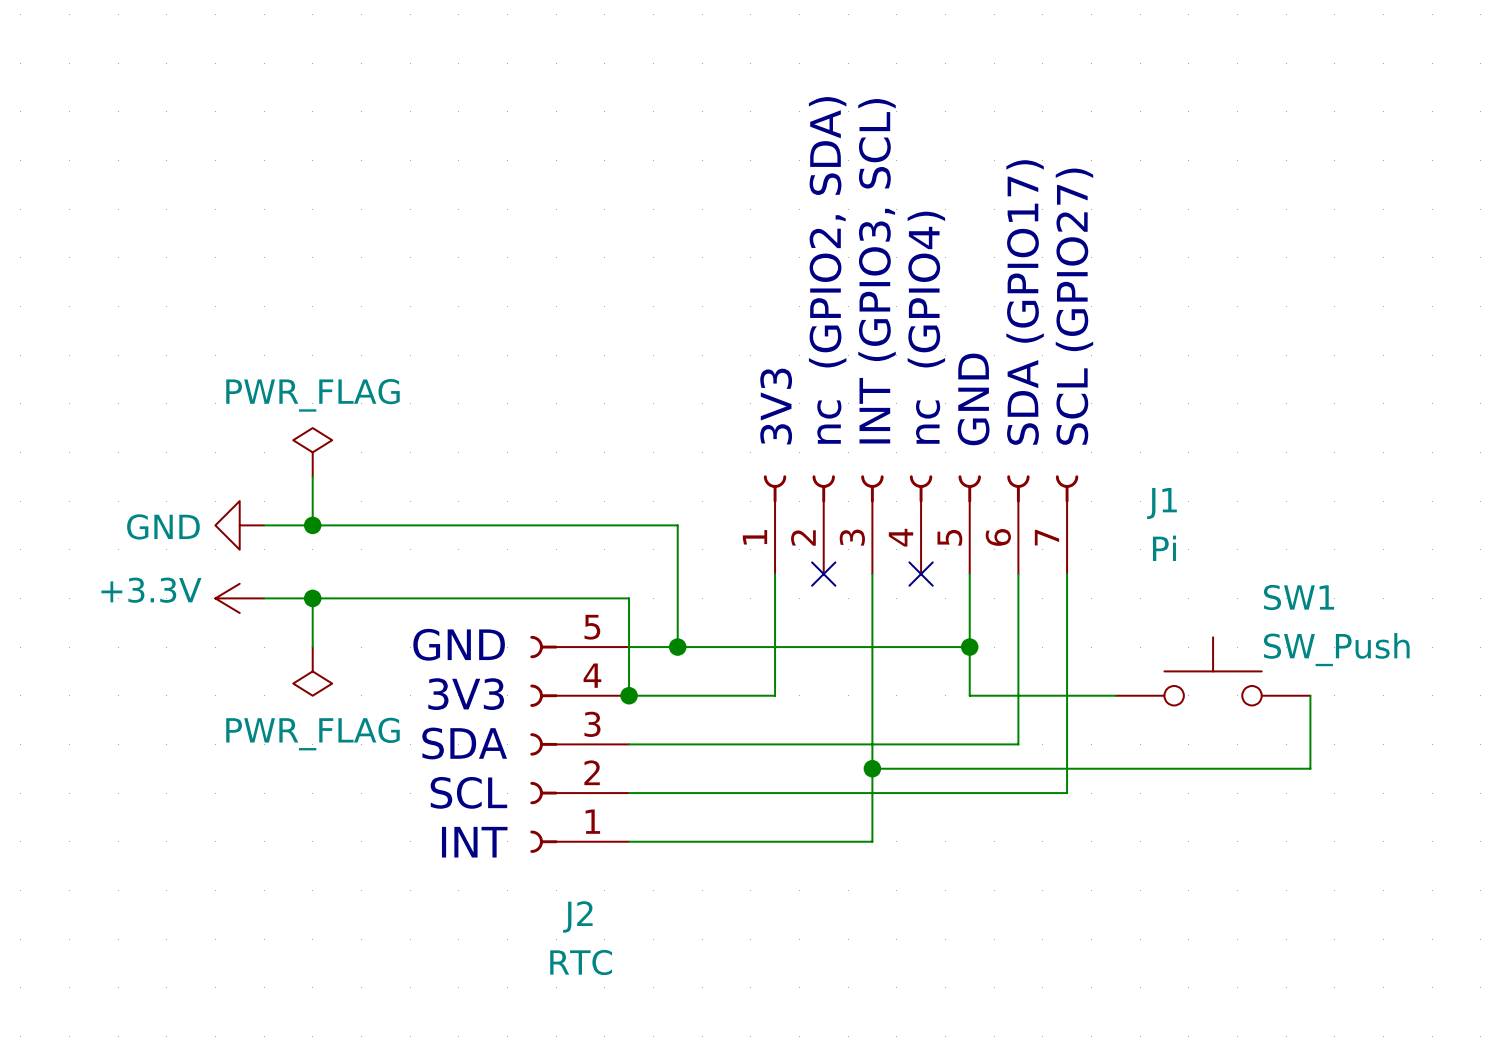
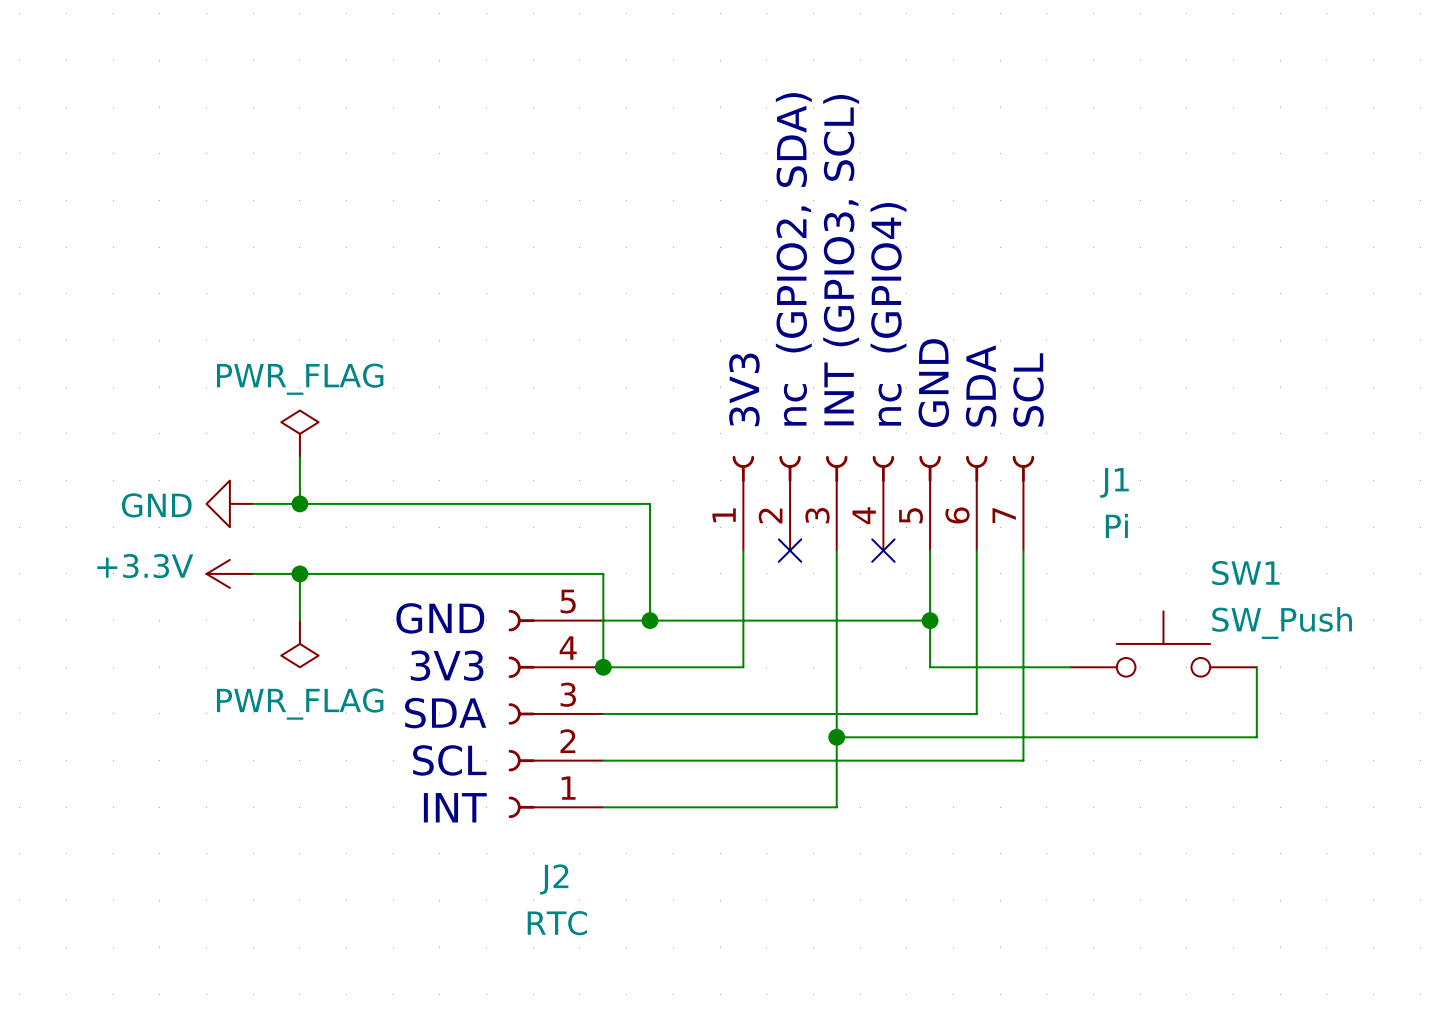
text: SDA (GPIO17) (1025, 302) -> SDA (981, 386)
text: SCL (GPIO27) (1074, 306) -> SCL (1028, 389)

